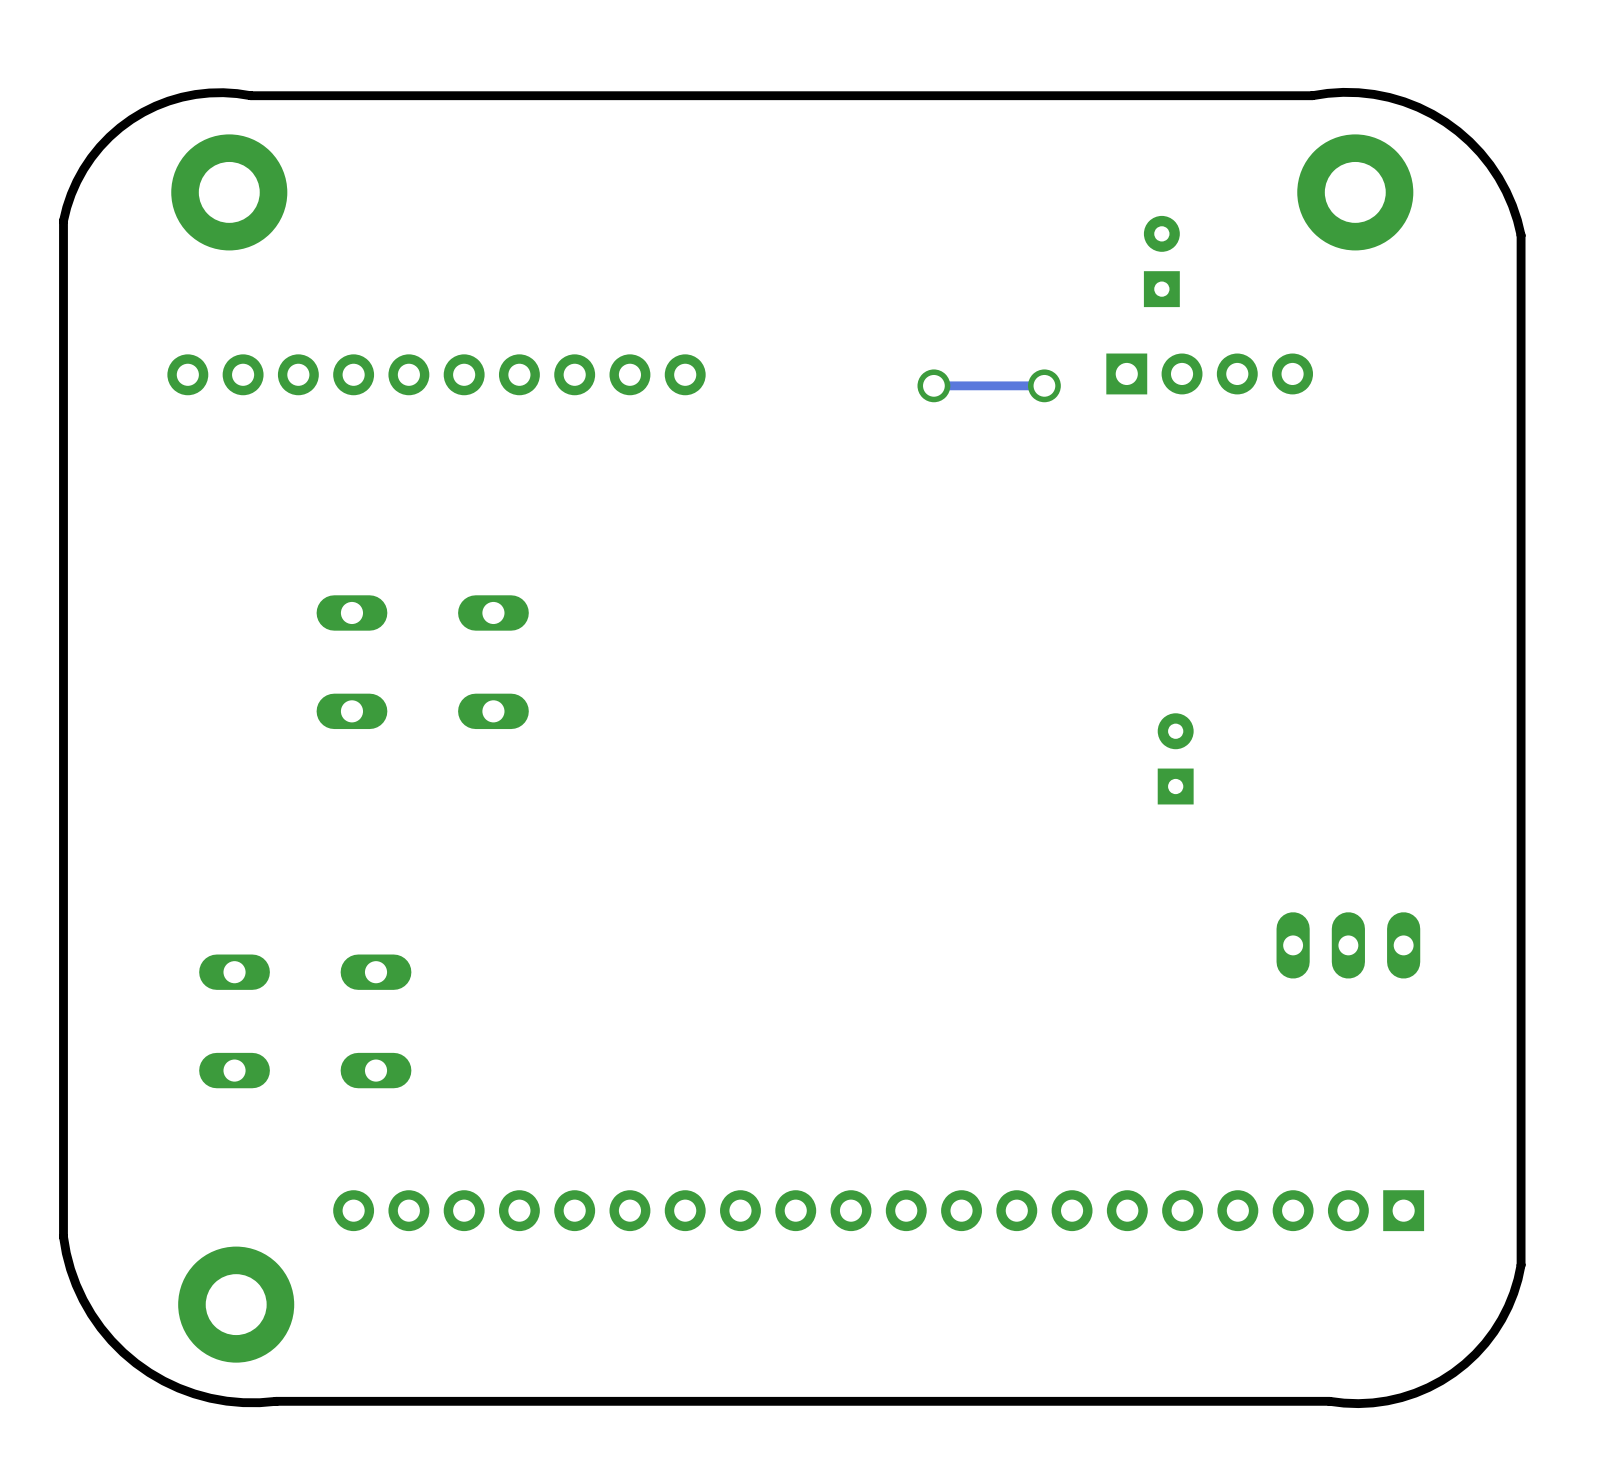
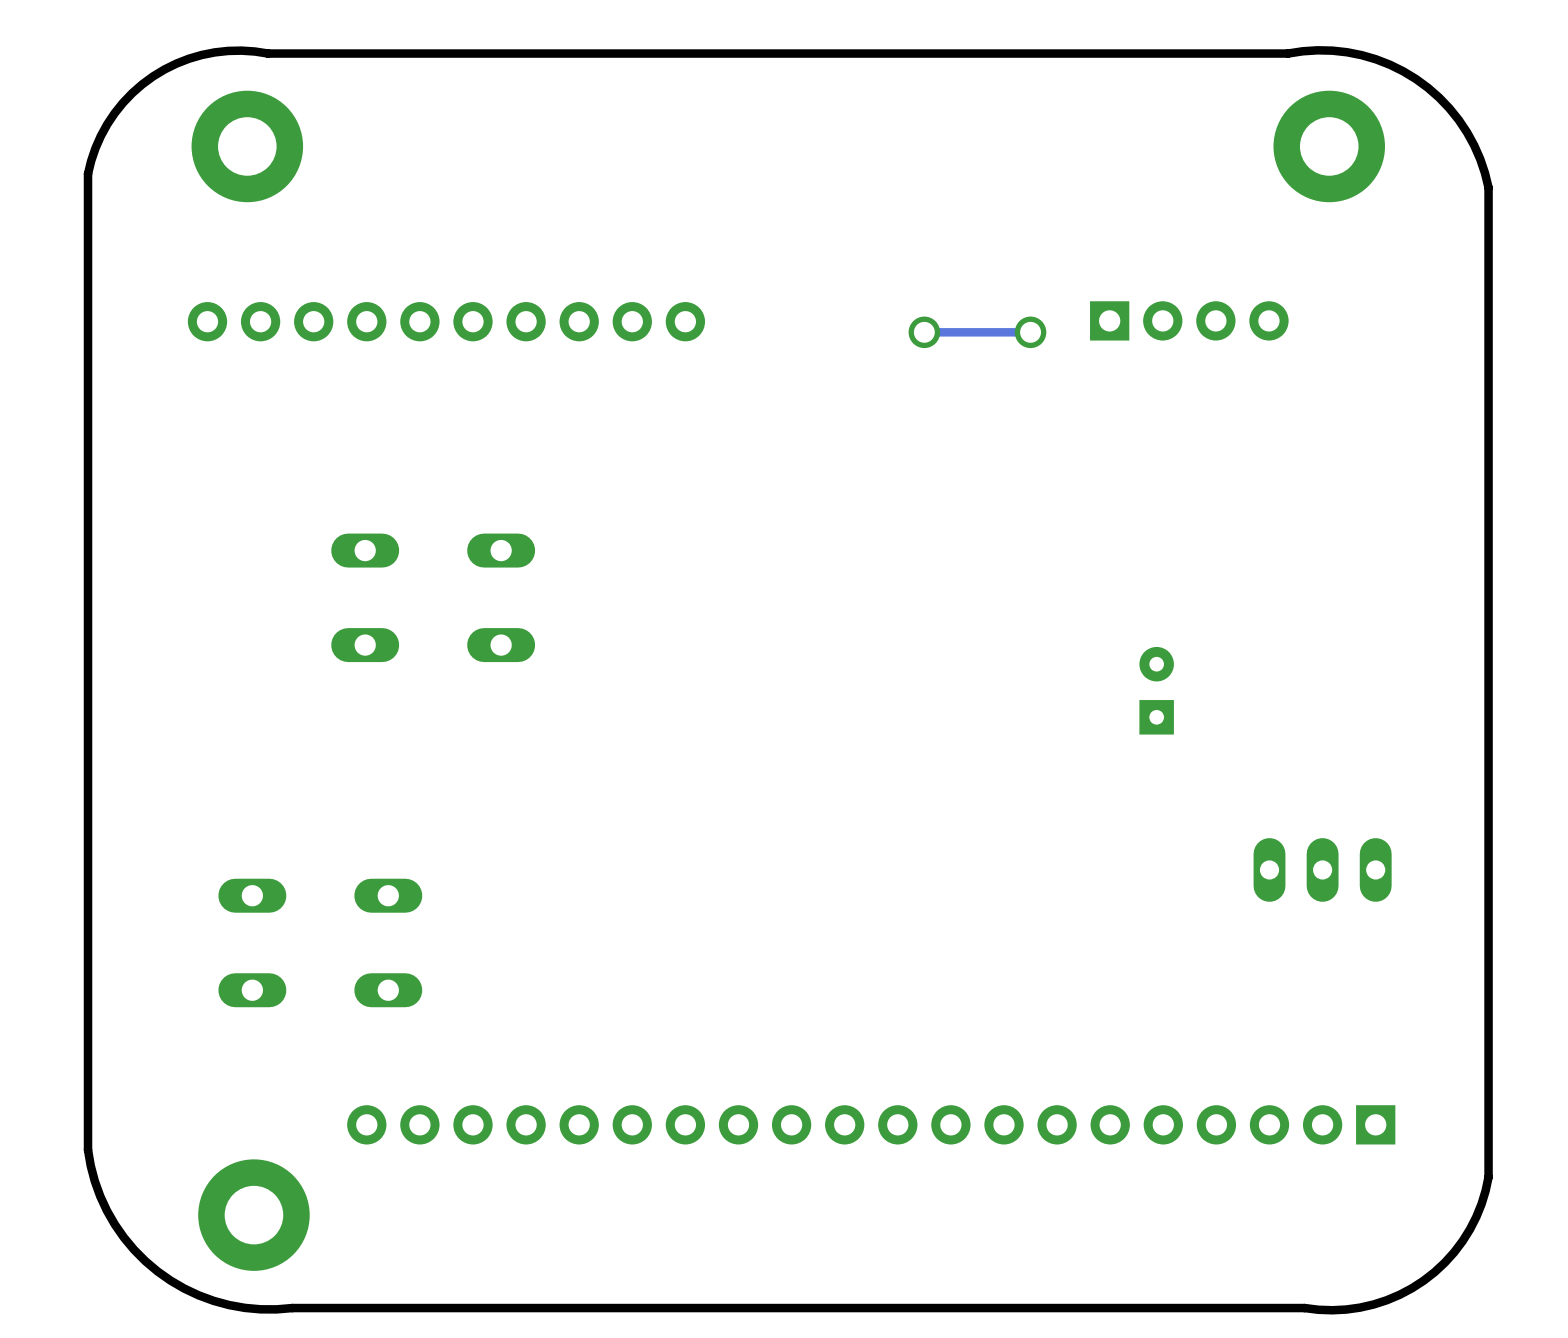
part: (1161, 261) -> none

